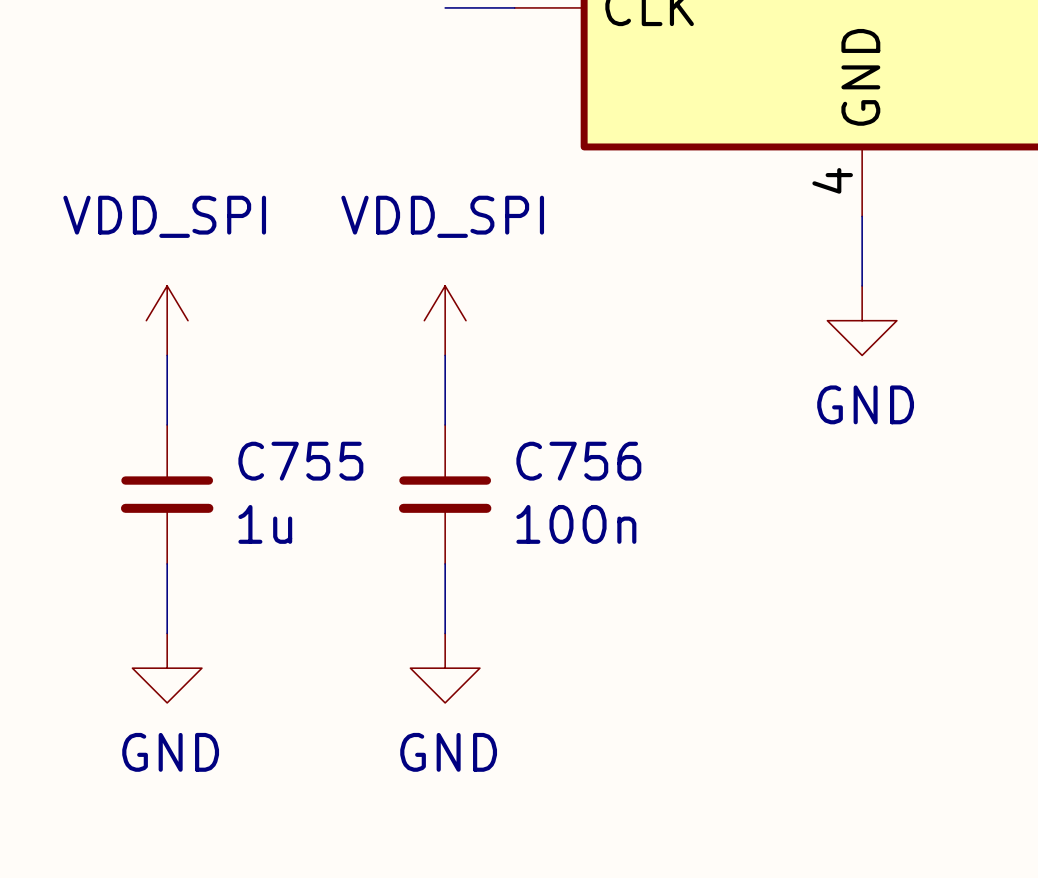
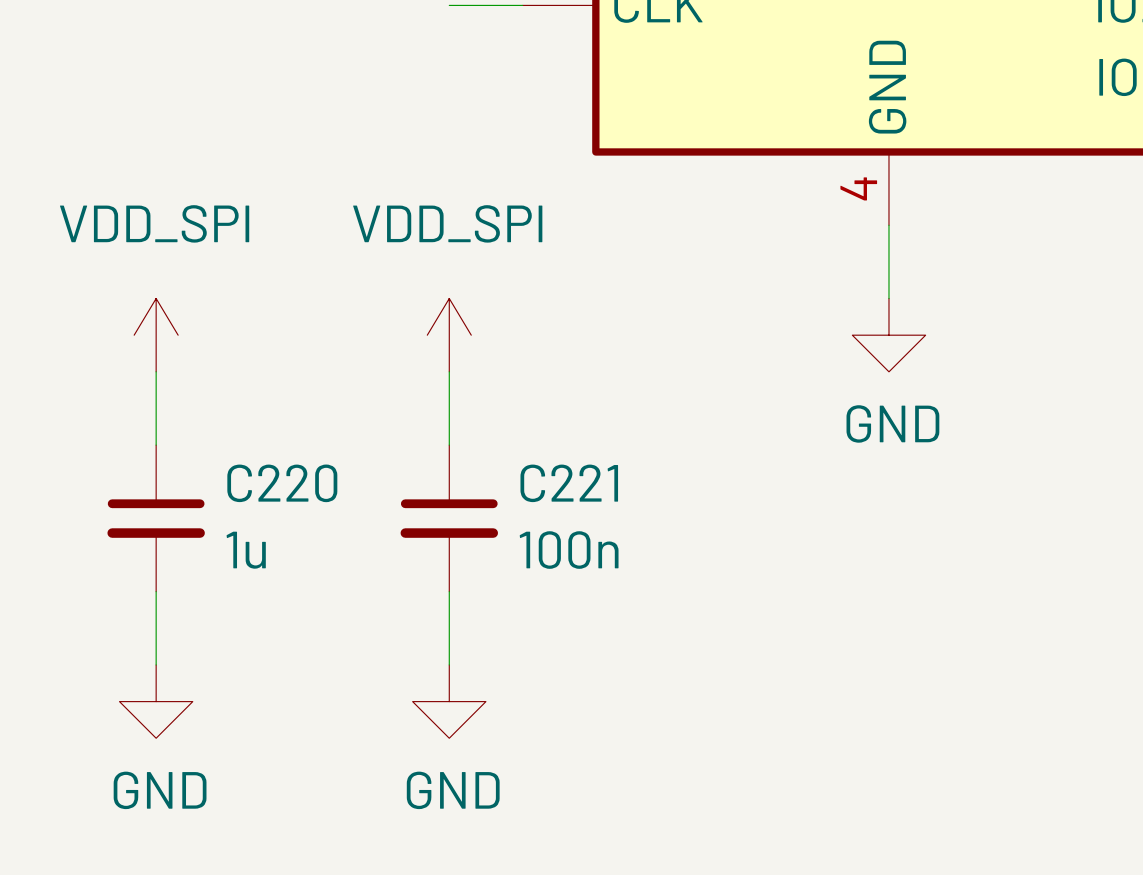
C755 name: C755 (300, 461) -> C220 (282, 483)
C756 name: C756 (578, 461) -> C221 (569, 483)

